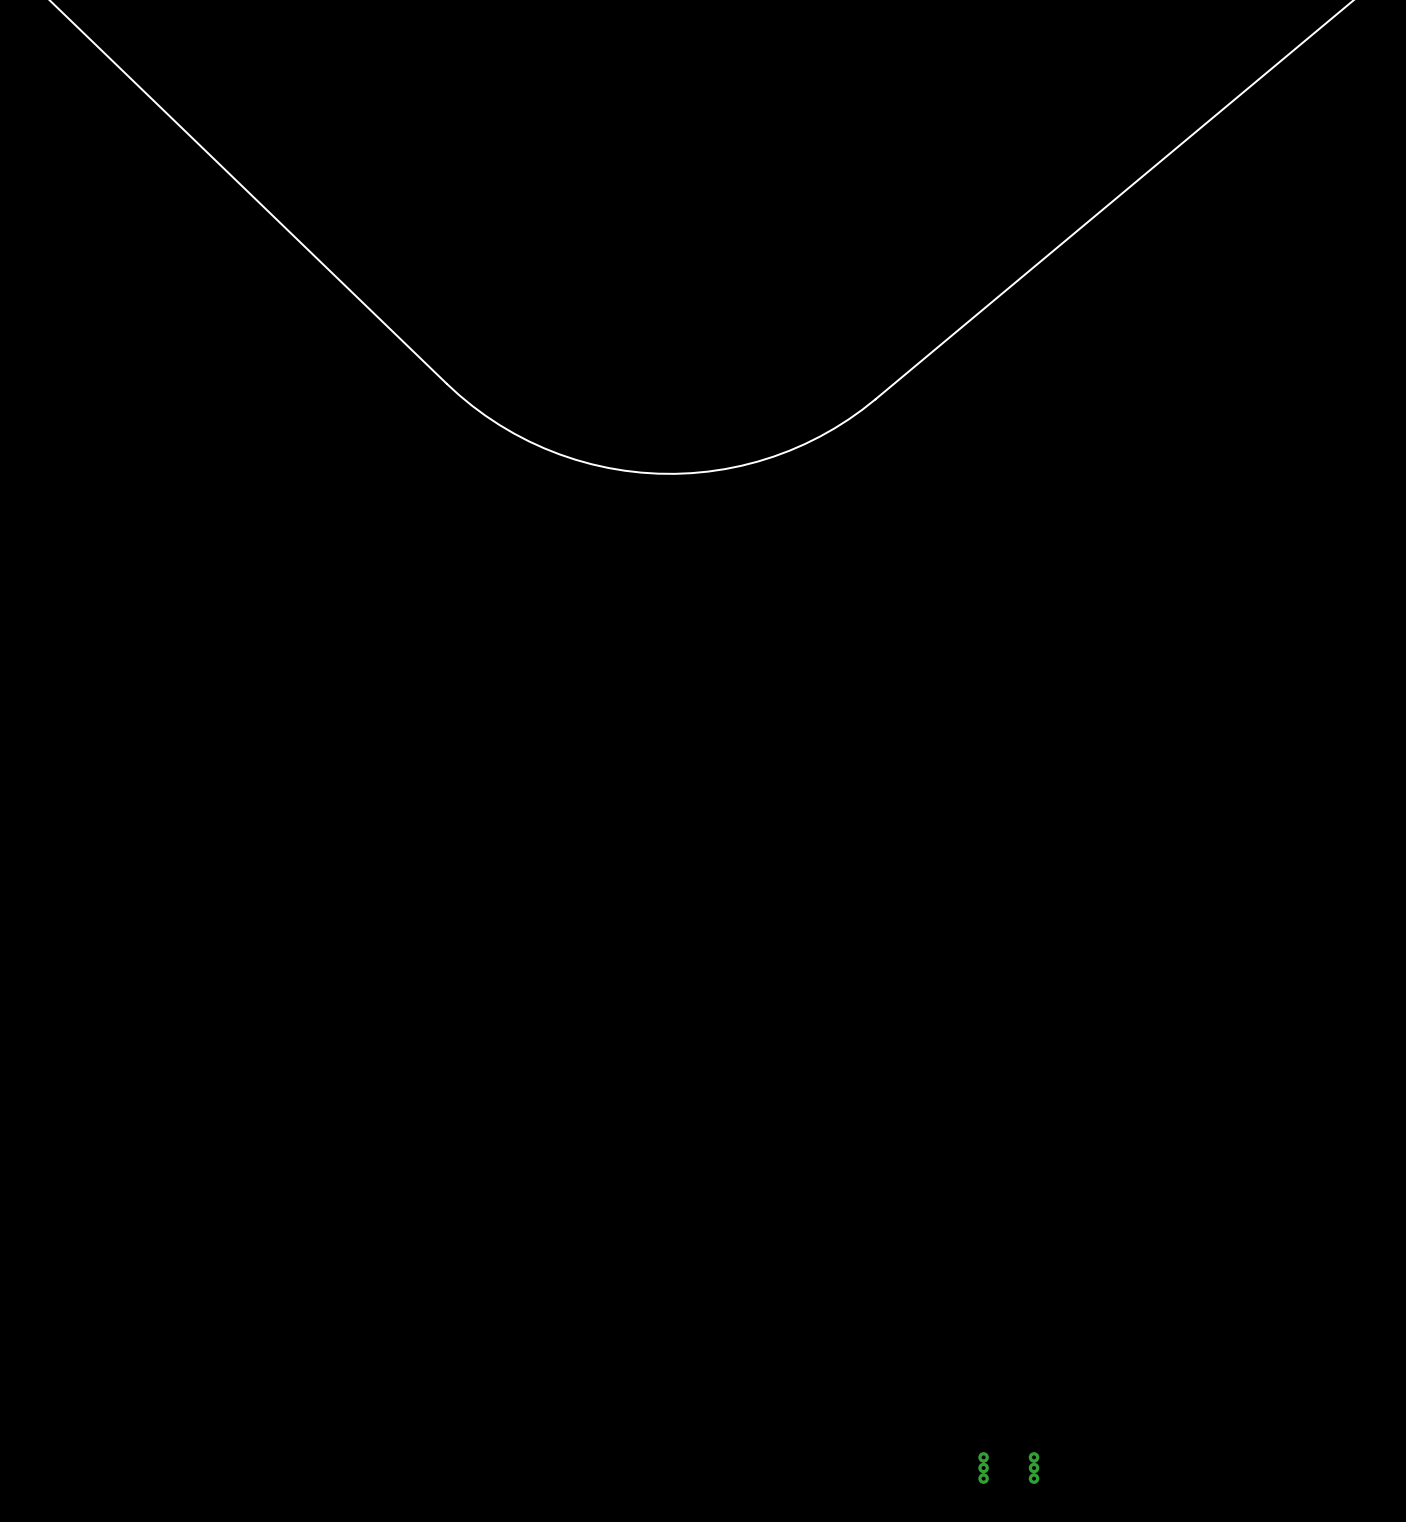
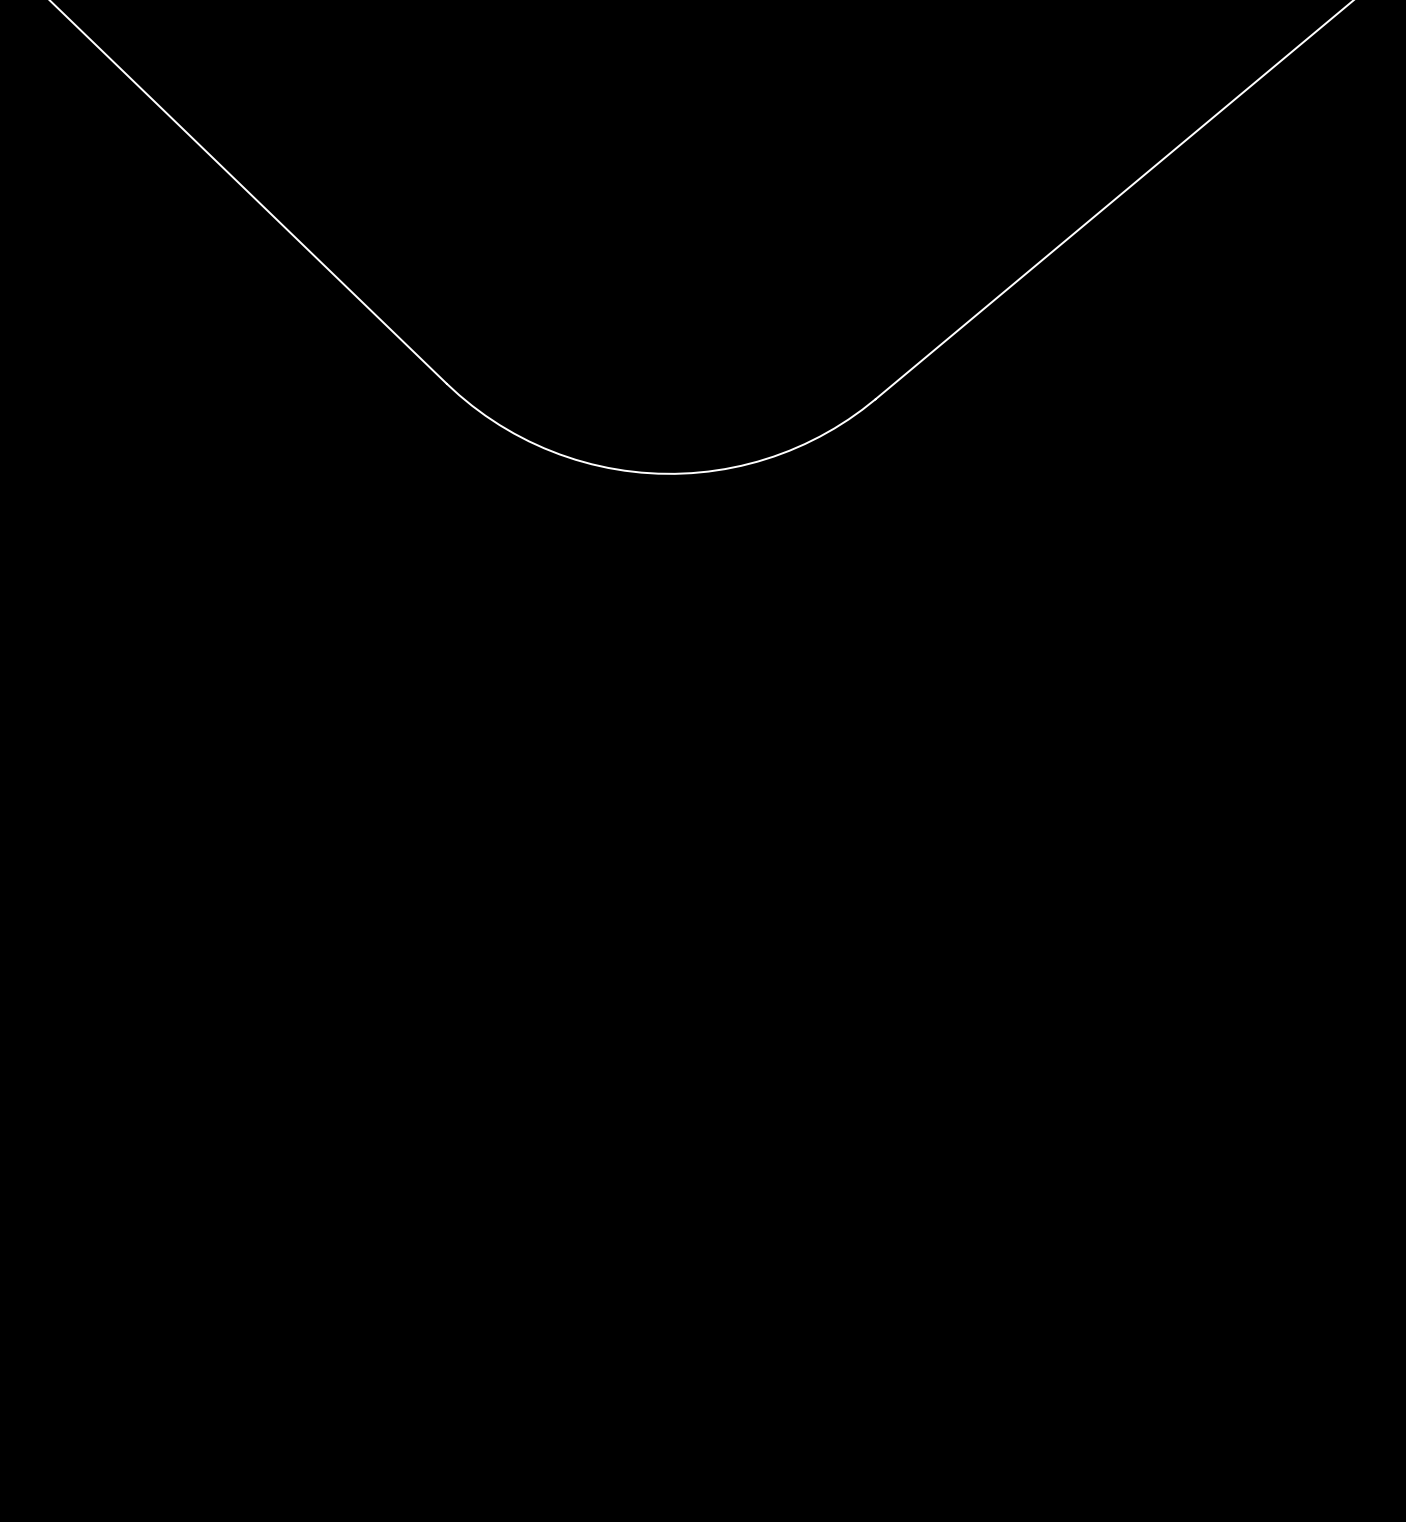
part: (983, 1468) -> none
part: (1034, 1468) -> none

